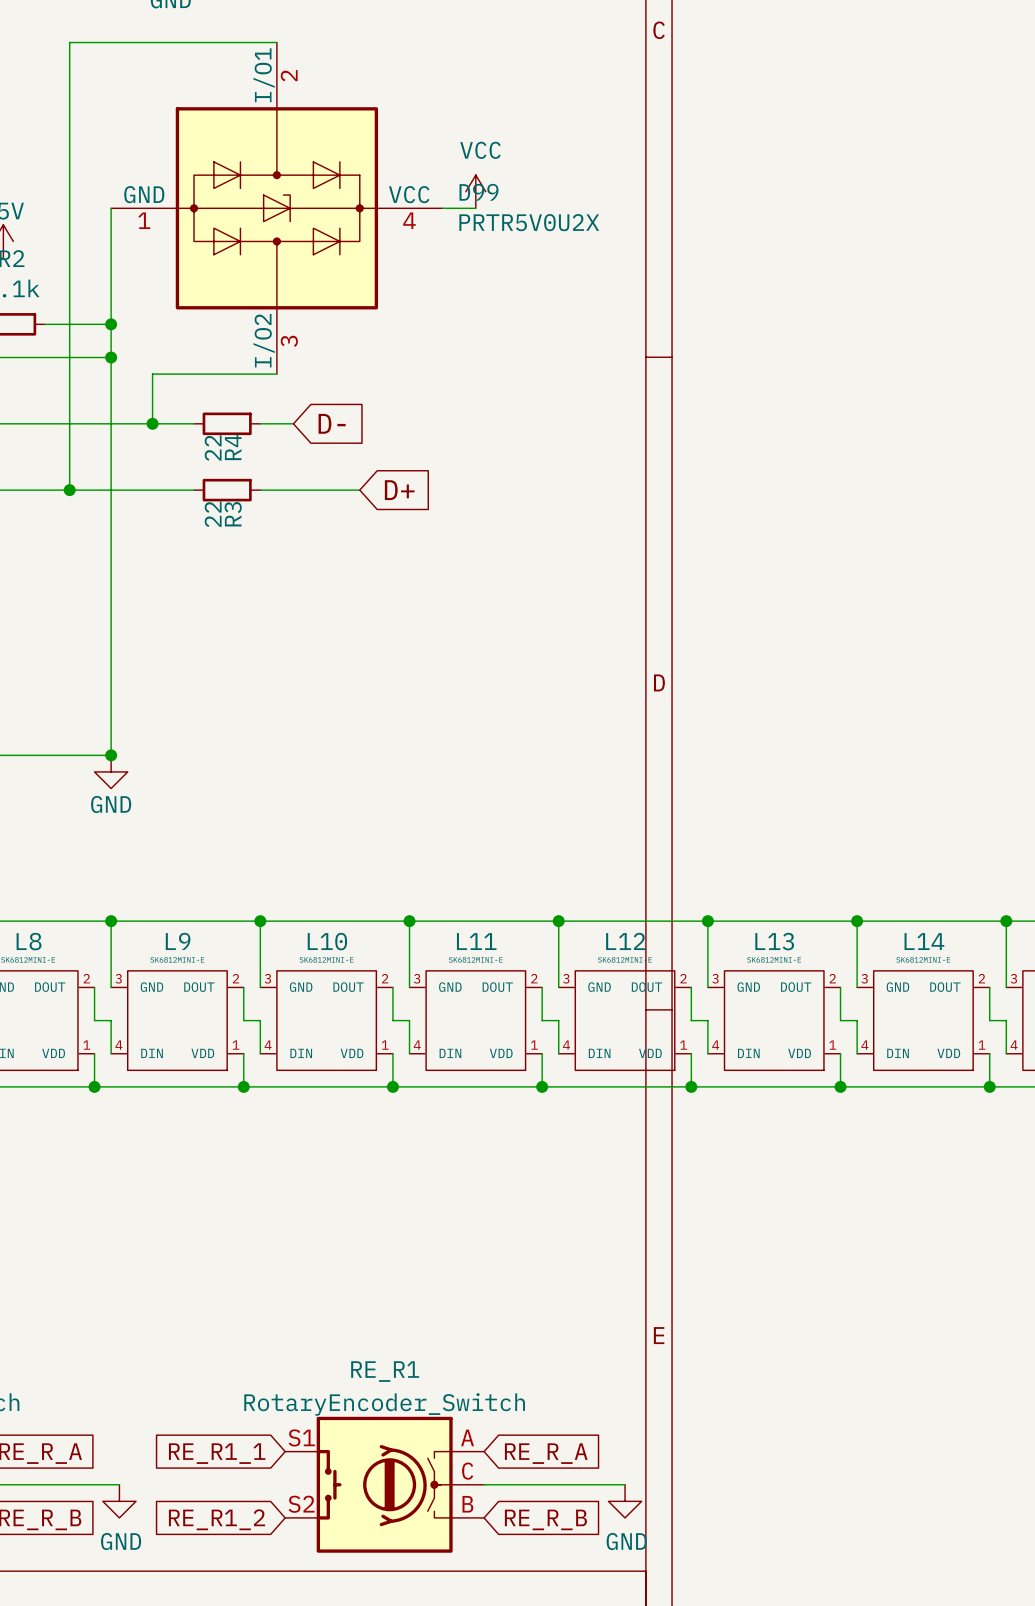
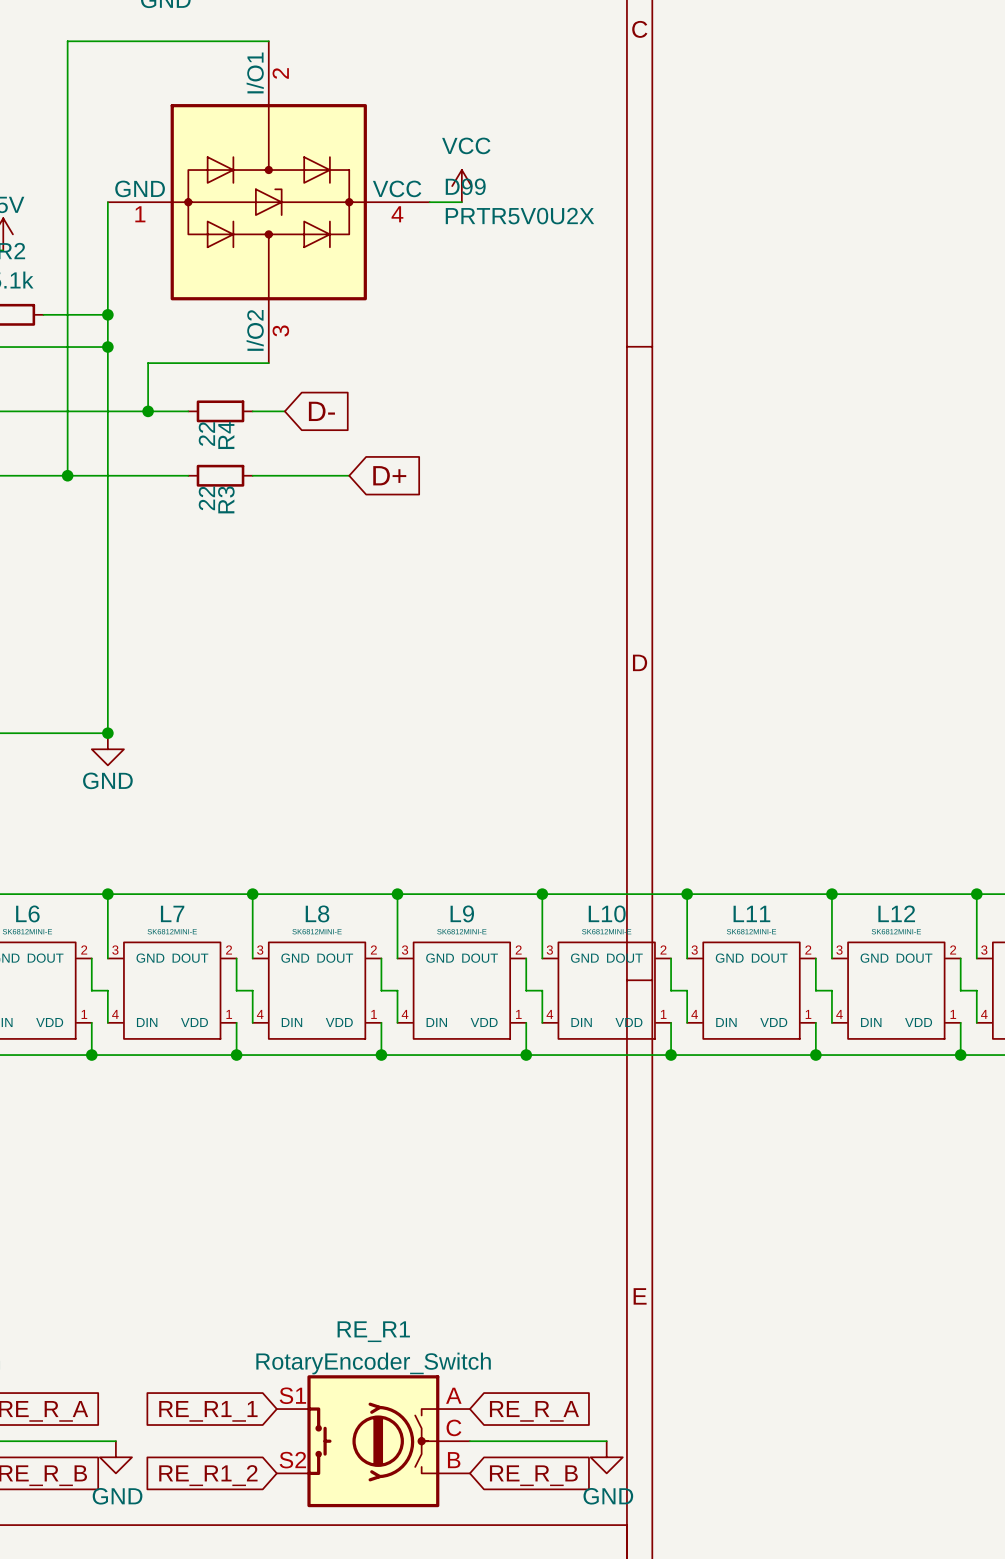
L8 name: L8 (29, 941) -> L6 (27, 913)
L9 name: L9 (178, 941) -> L7 (172, 913)
L10 name: L10 (327, 941) -> L8 (317, 913)
L11 name: L11 (476, 941) -> L9 (462, 913)
L12 name: L12 (625, 941) -> L10 (607, 913)
L13 name: L13 (774, 941) -> L11 (751, 913)
L14 name: L14 (924, 941) -> L12 (896, 913)

